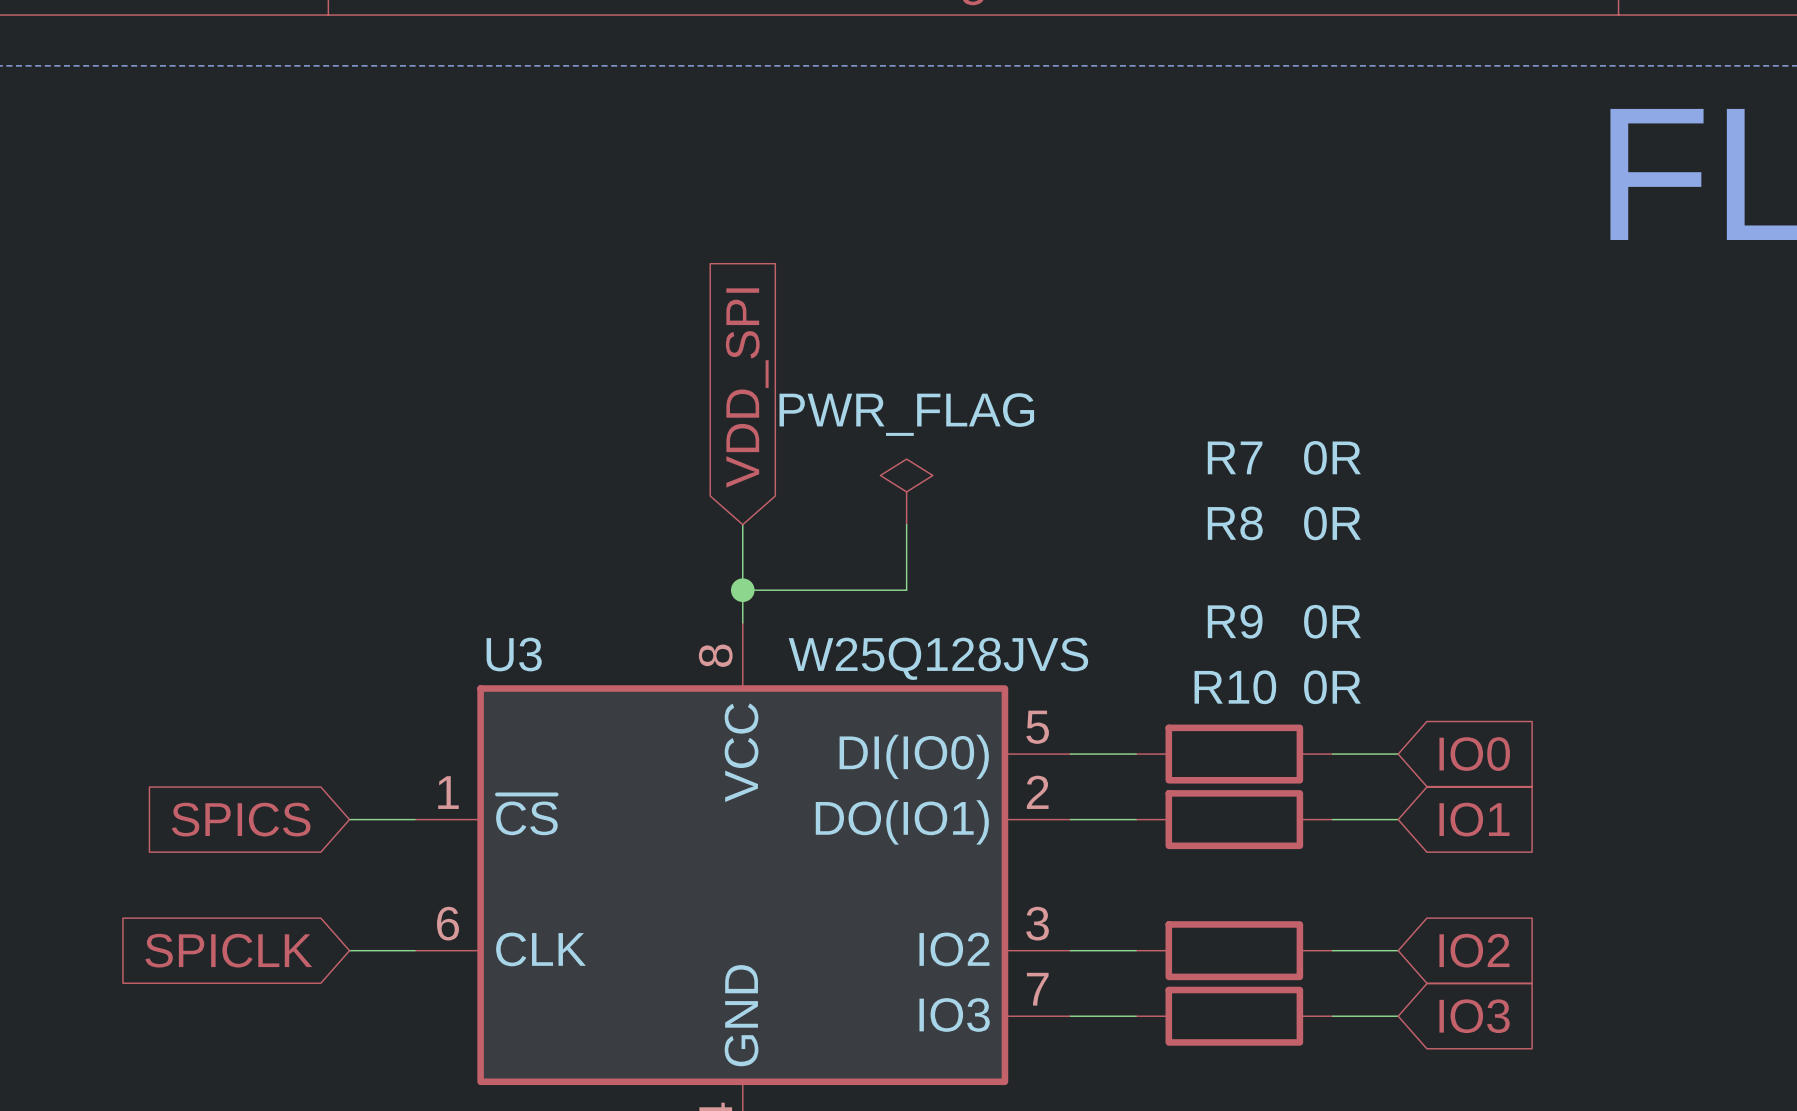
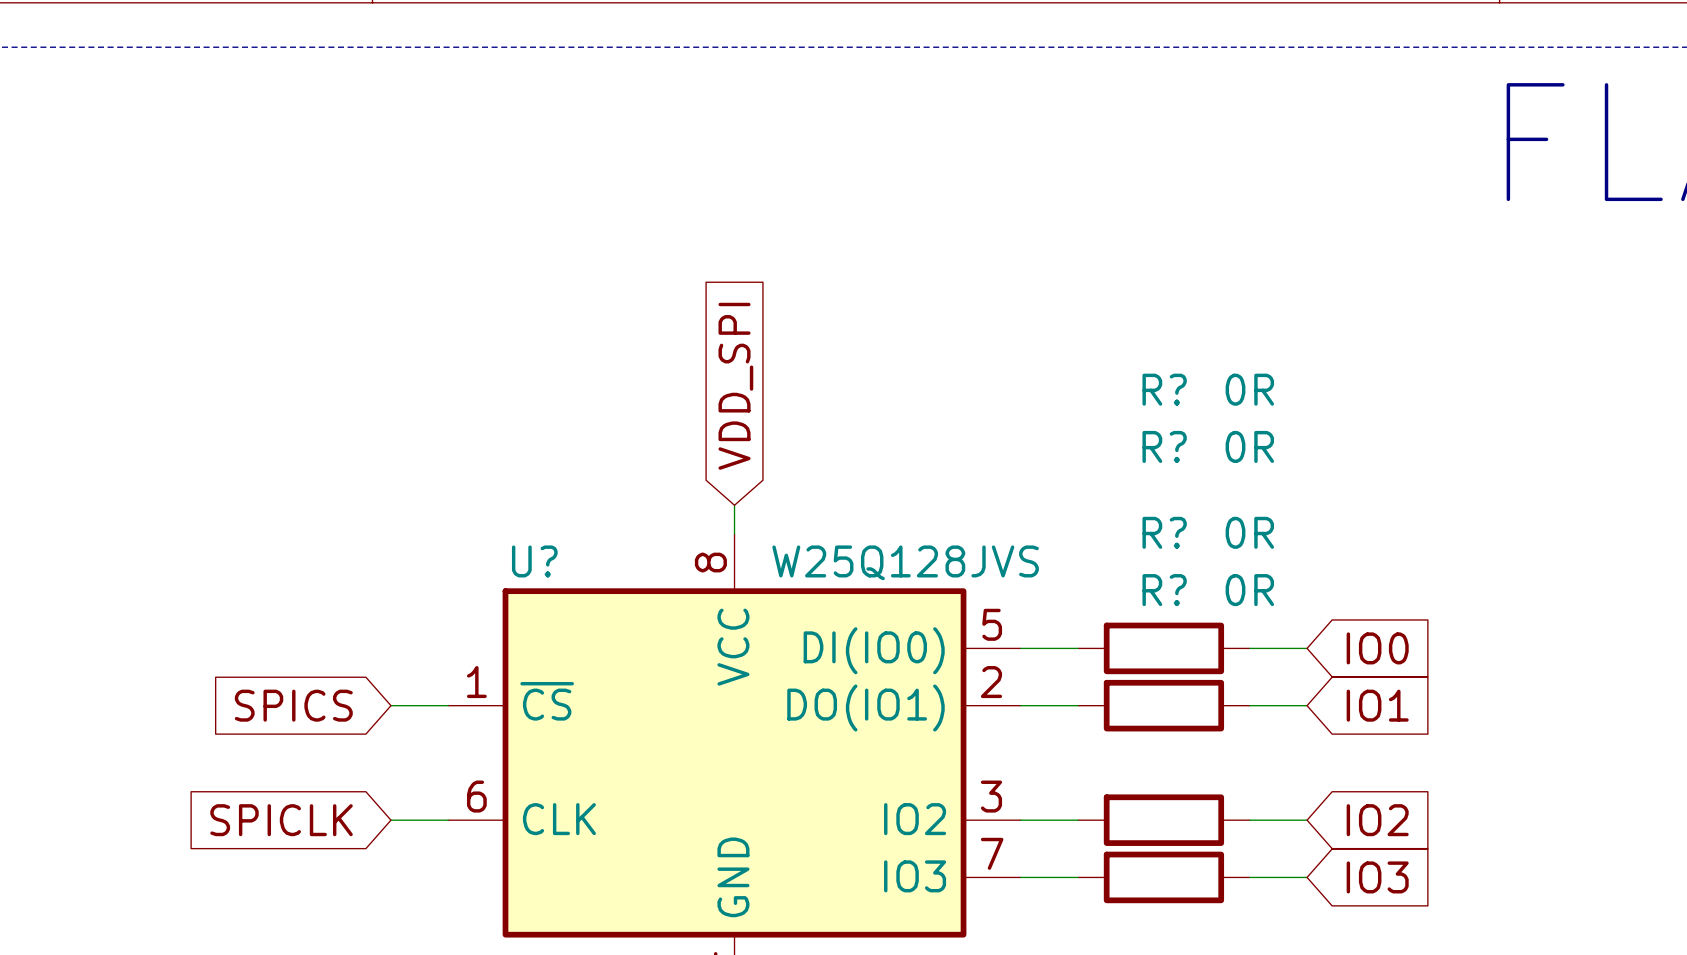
global label position: VDD_SPI (747, 387) -> VDD_SPI (735, 386)
R7 name: R7 (1235, 457) -> R? (1164, 389)
power symbol: PWR_FLAG (906, 491) -> none
R8 name: R8 (1235, 523) -> R? (1164, 446)
wire: (742, 524) (742, 590) (906, 590) (906, 524) -> none
junction: (742, 590) -> none
R9 name: R9 (1235, 621) -> R? (1164, 532)
U3 name: U3 (514, 654) -> U? (534, 561)
R10 name: R10 (1235, 687) -> R? (1164, 590)

